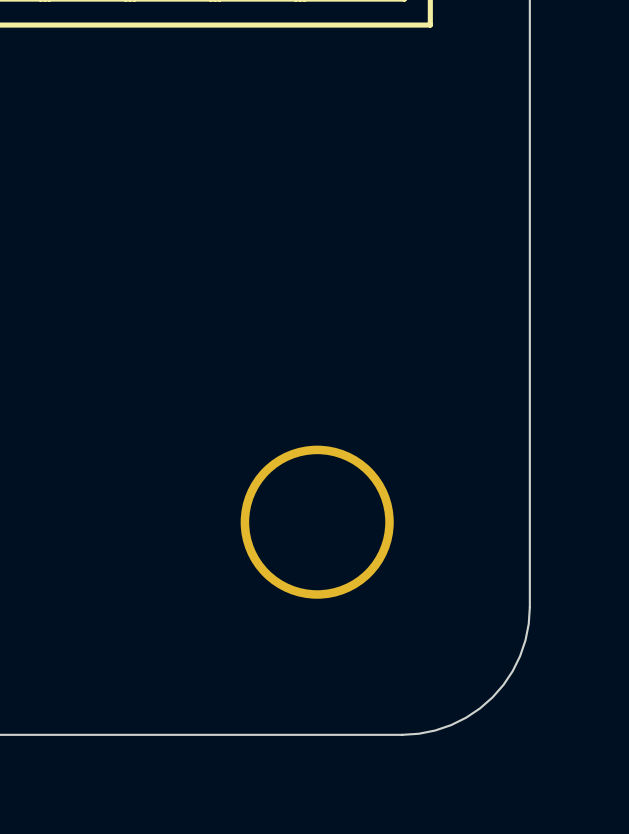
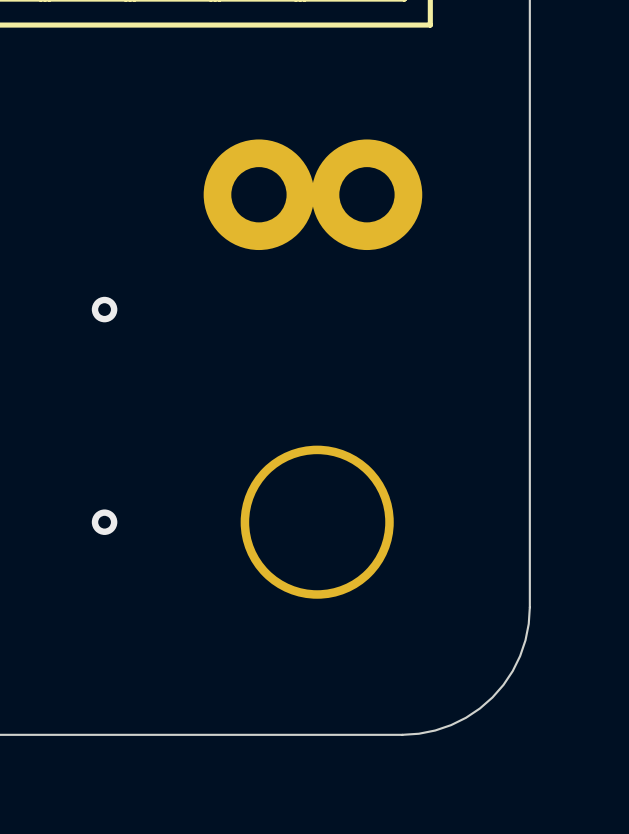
part: none -> (312, 194)
via: none -> (104, 309)
via: none -> (104, 522)

